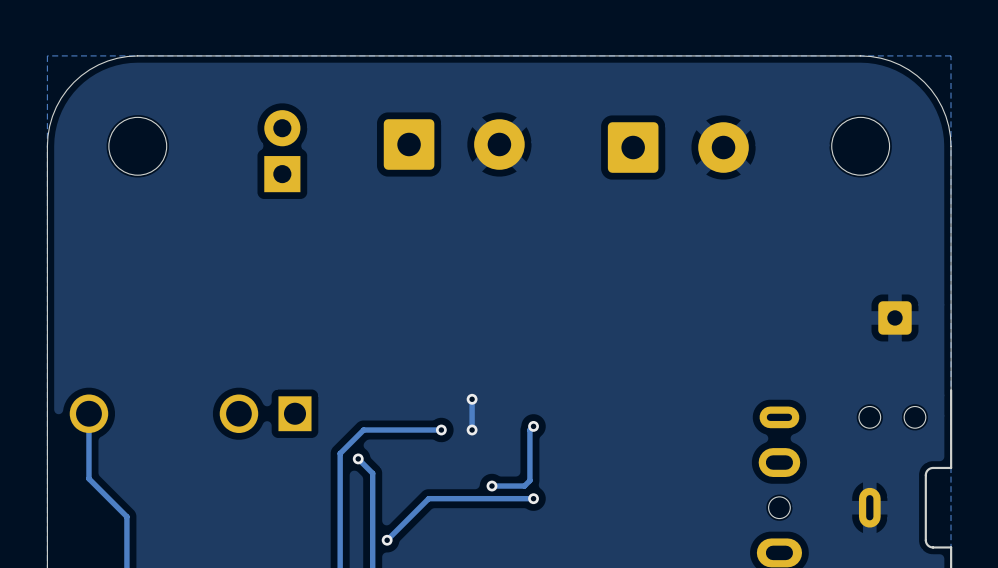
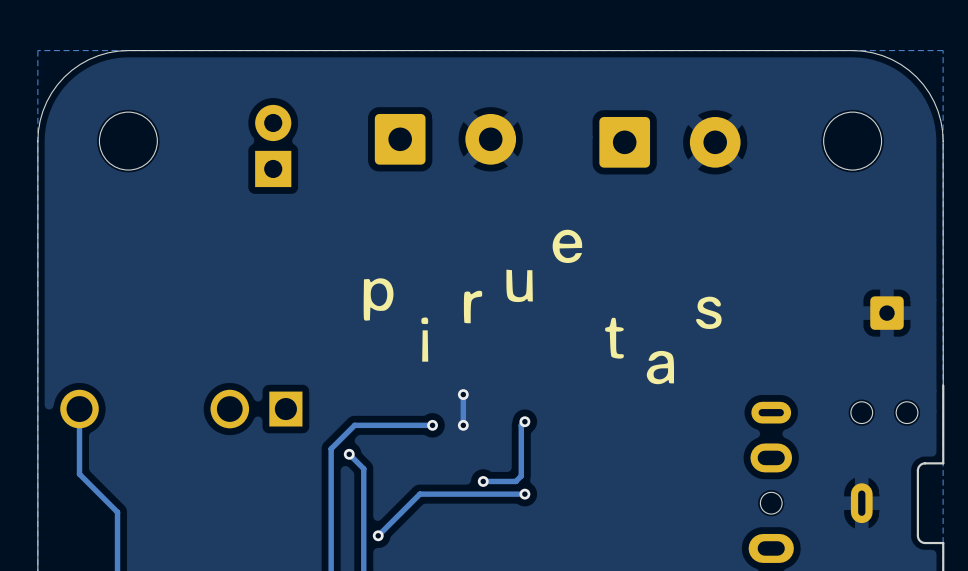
drawing: none -> [506, 229, 583, 303]
drawing: none -> [363, 278, 394, 321]
drawing: none -> [463, 290, 483, 324]
drawing: none -> [696, 296, 722, 329]
drawing: none -> [421, 317, 429, 362]
drawing: none -> [605, 317, 624, 359]
drawing: none -> [646, 350, 675, 385]

